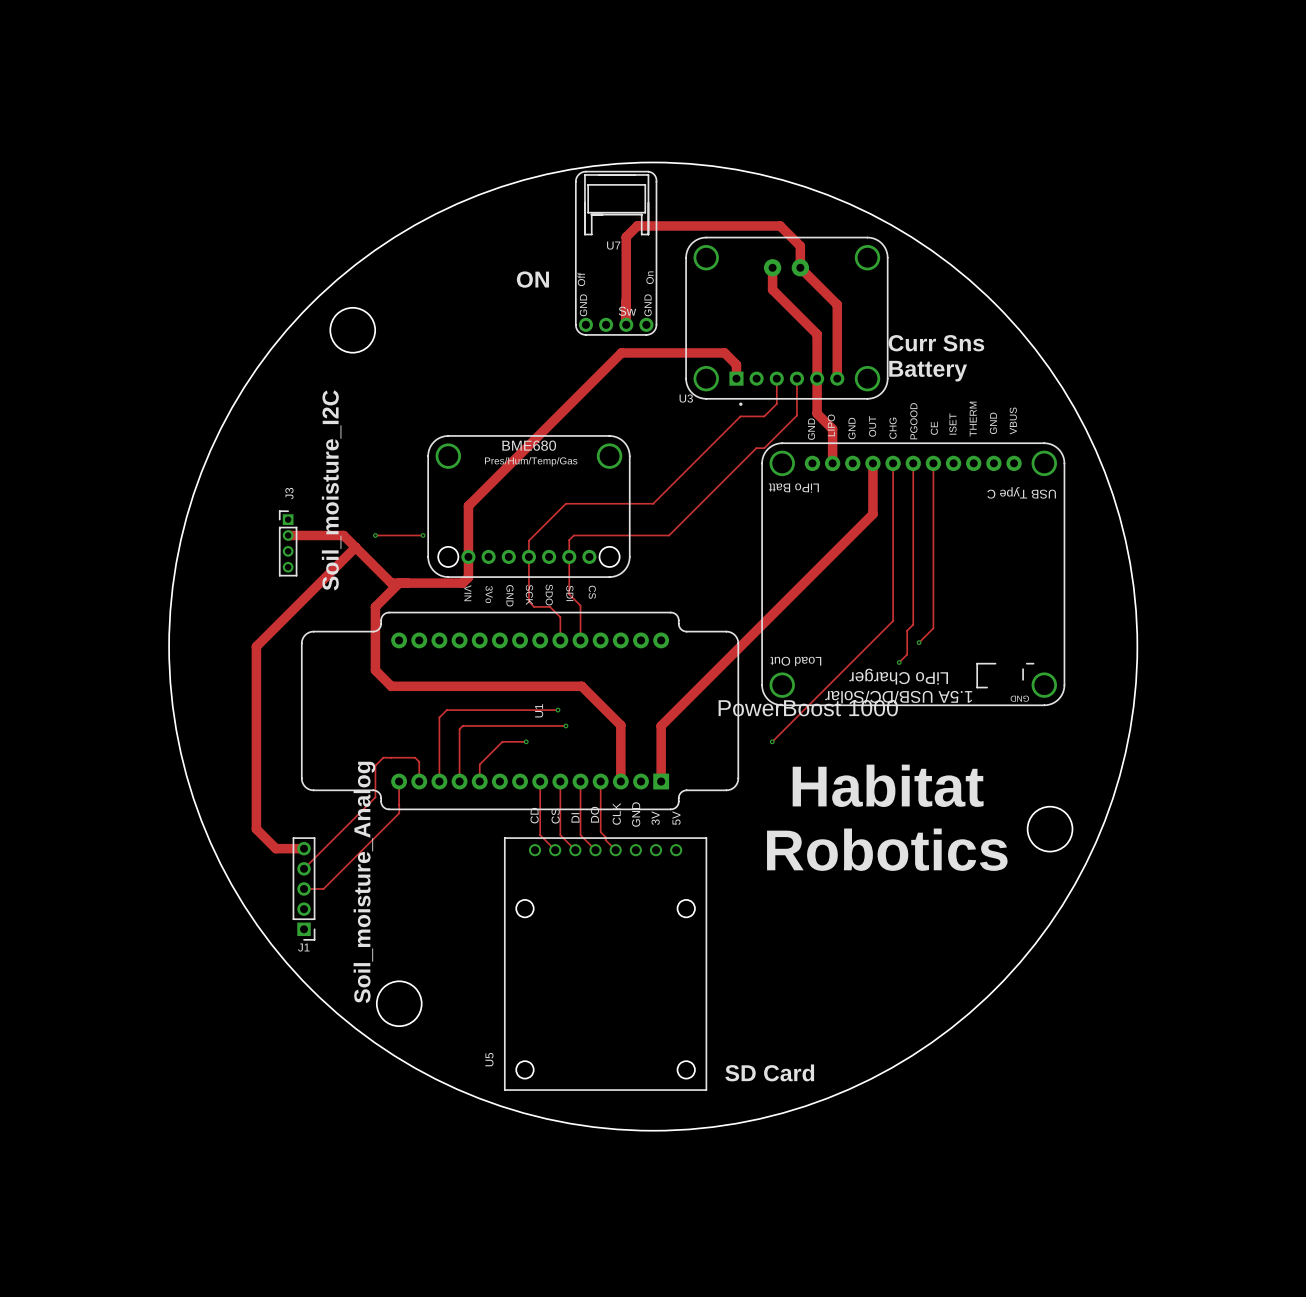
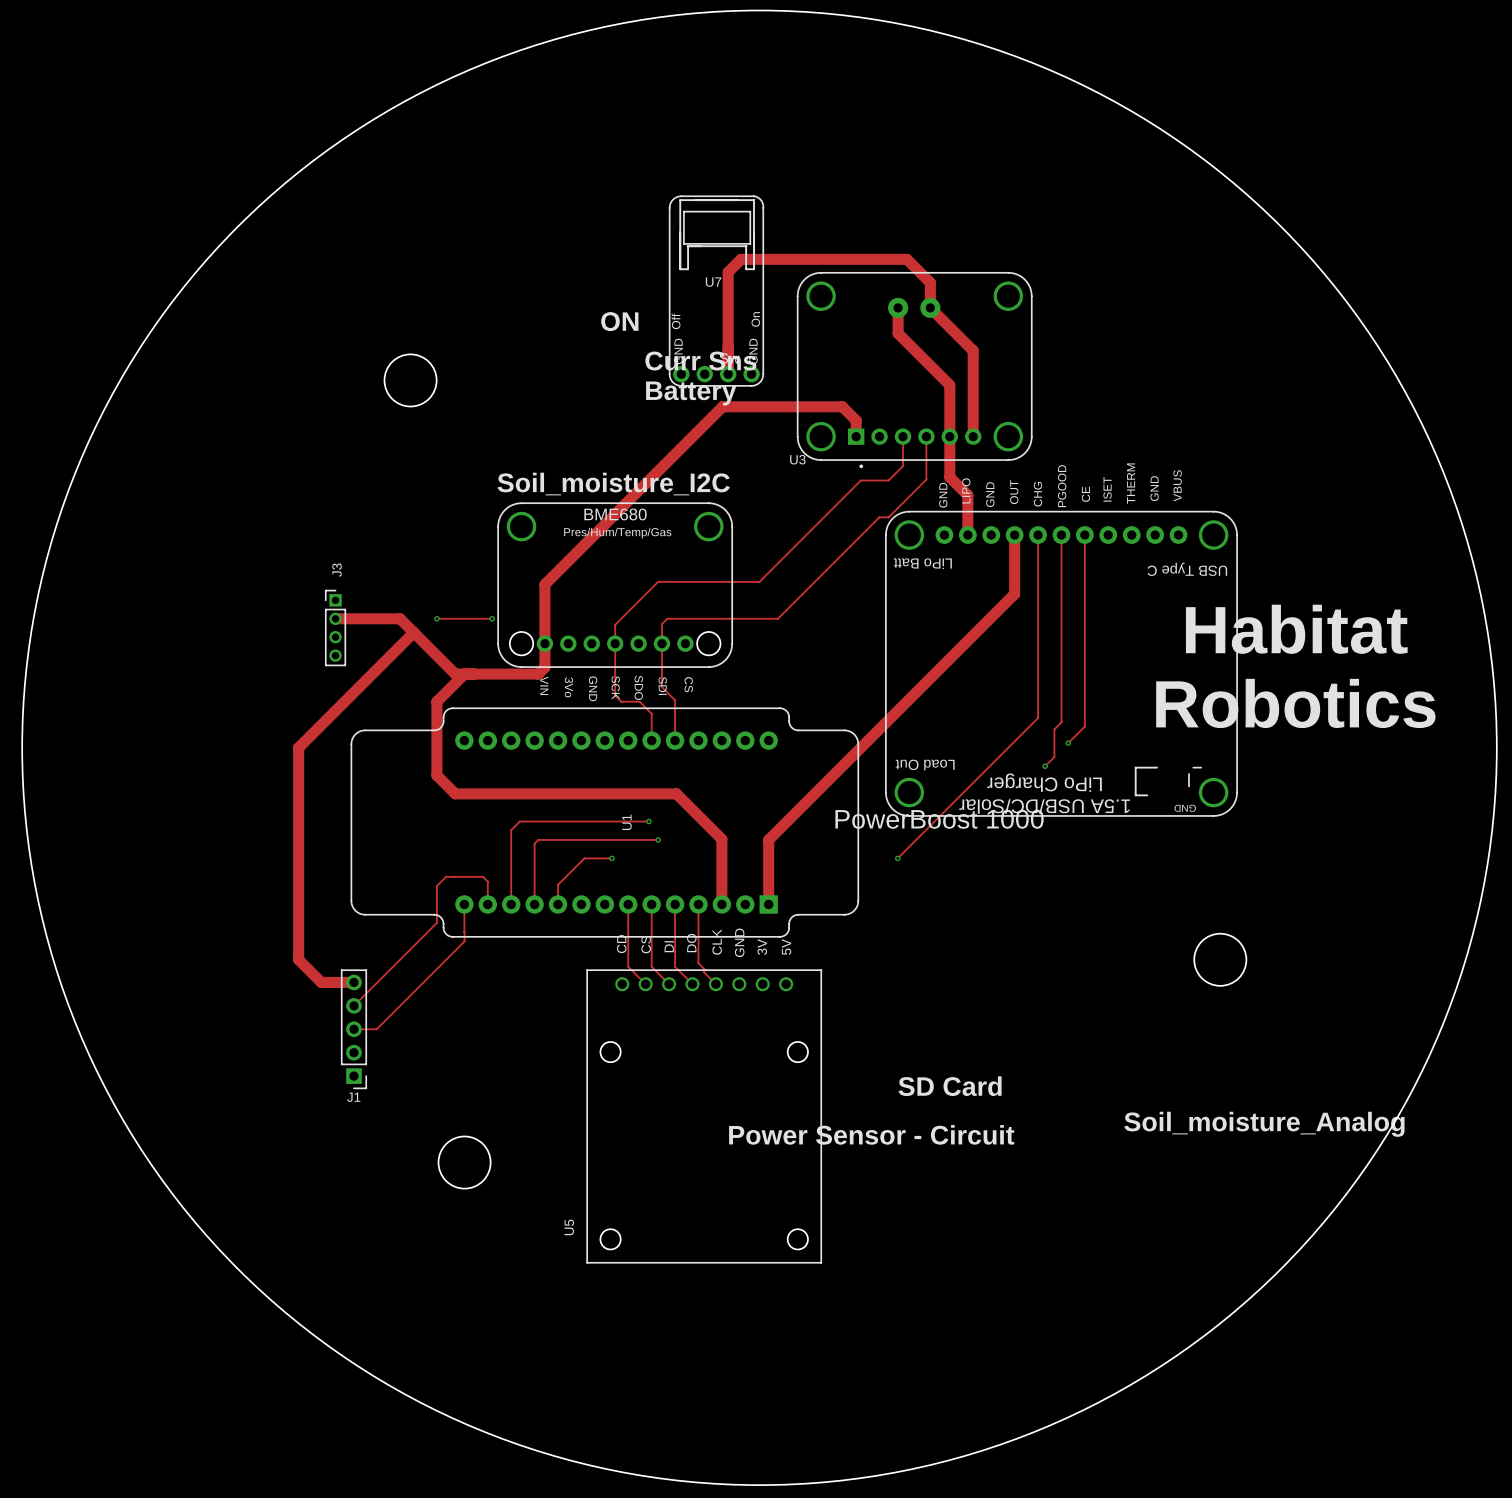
round board edge size: [168, 162, 1138, 1131] -> [21, 10, 1498, 1486]
text: none -> Curr Sns (700, 361)
text: none -> Battery (691, 393)
text: Curr Sns (936, 343) -> none
text: Battery (928, 371) -> none
text rotation: 0° (331, 490) -> 90° clockwise (613, 484)
text: none -> Habitat (1296, 629)
text: none -> Robotics (1295, 703)
text: Habitat (888, 785) -> none
text: Robotics (887, 849) -> none
text: Soil_moisture_Analog (364, 882) -> none
text: none -> Soil_moisture_Analog (1264, 1124)
text: none -> Power Sensor - Circuit (871, 1134)
text position: SD Card (769, 1072) -> SD Card (950, 1086)

